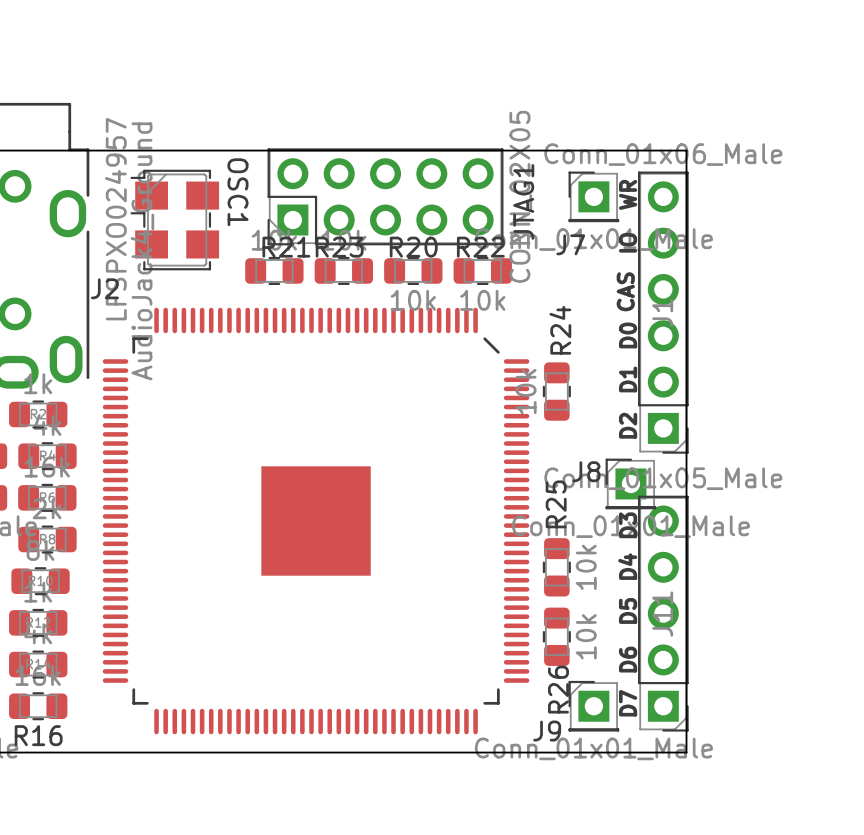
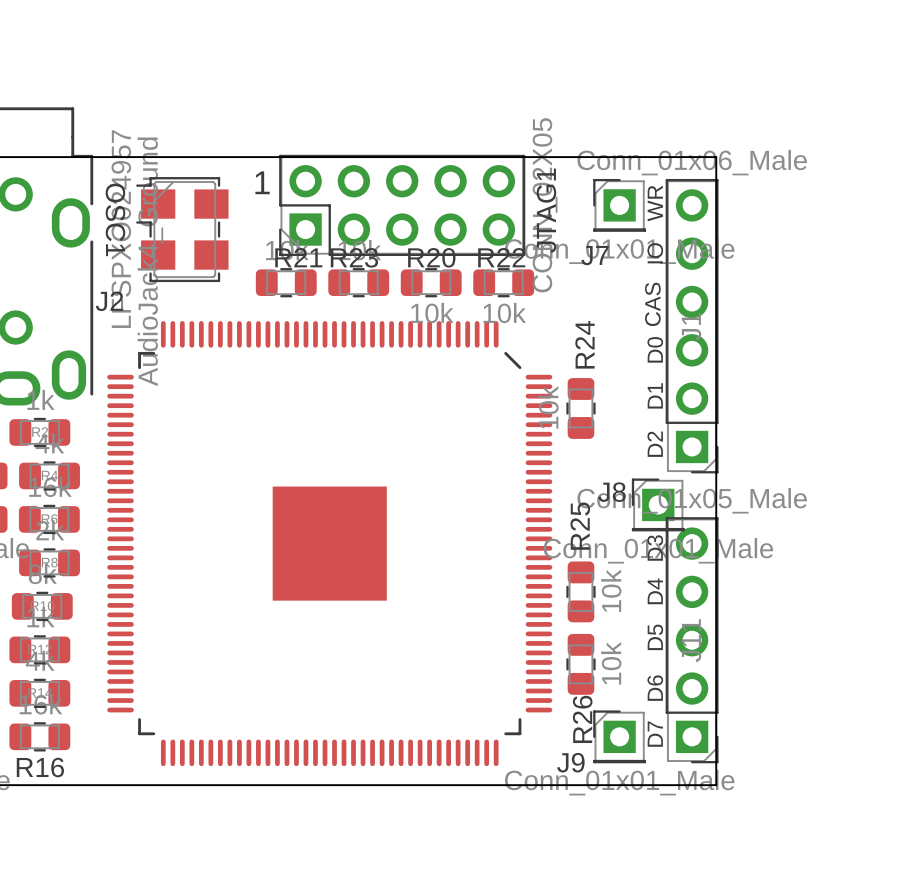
text: none -> 1 (262, 182)
OSC1 name position: OSC1 (238, 192) -> OSC1 (115, 219)

